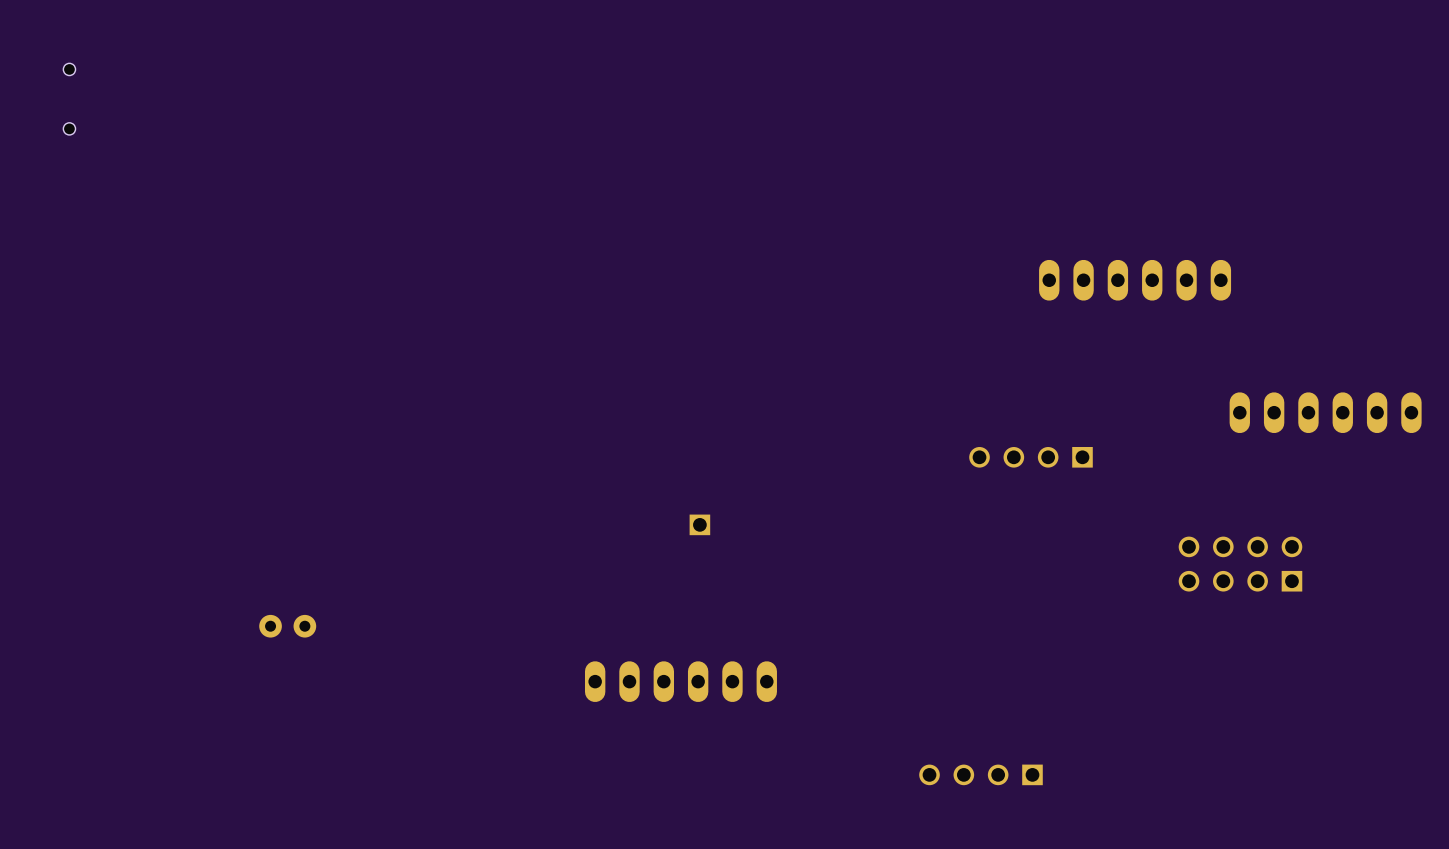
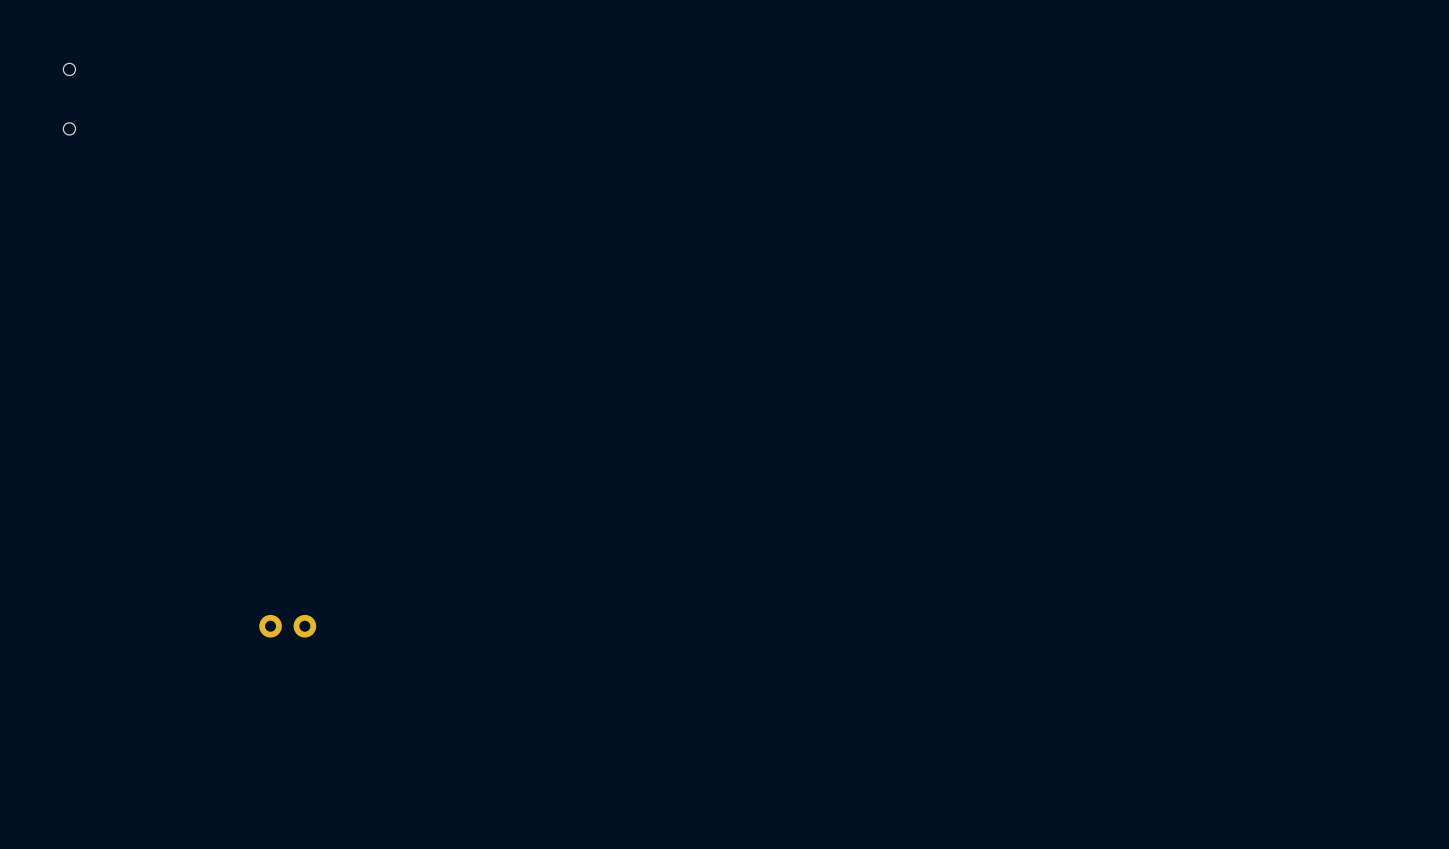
part: (1135, 280) -> none
part: (1325, 412) -> none
part: (1031, 457) -> none
part: (699, 524) -> none
part: (1240, 564) -> none
part: (680, 681) -> none
part: (981, 774) -> none

